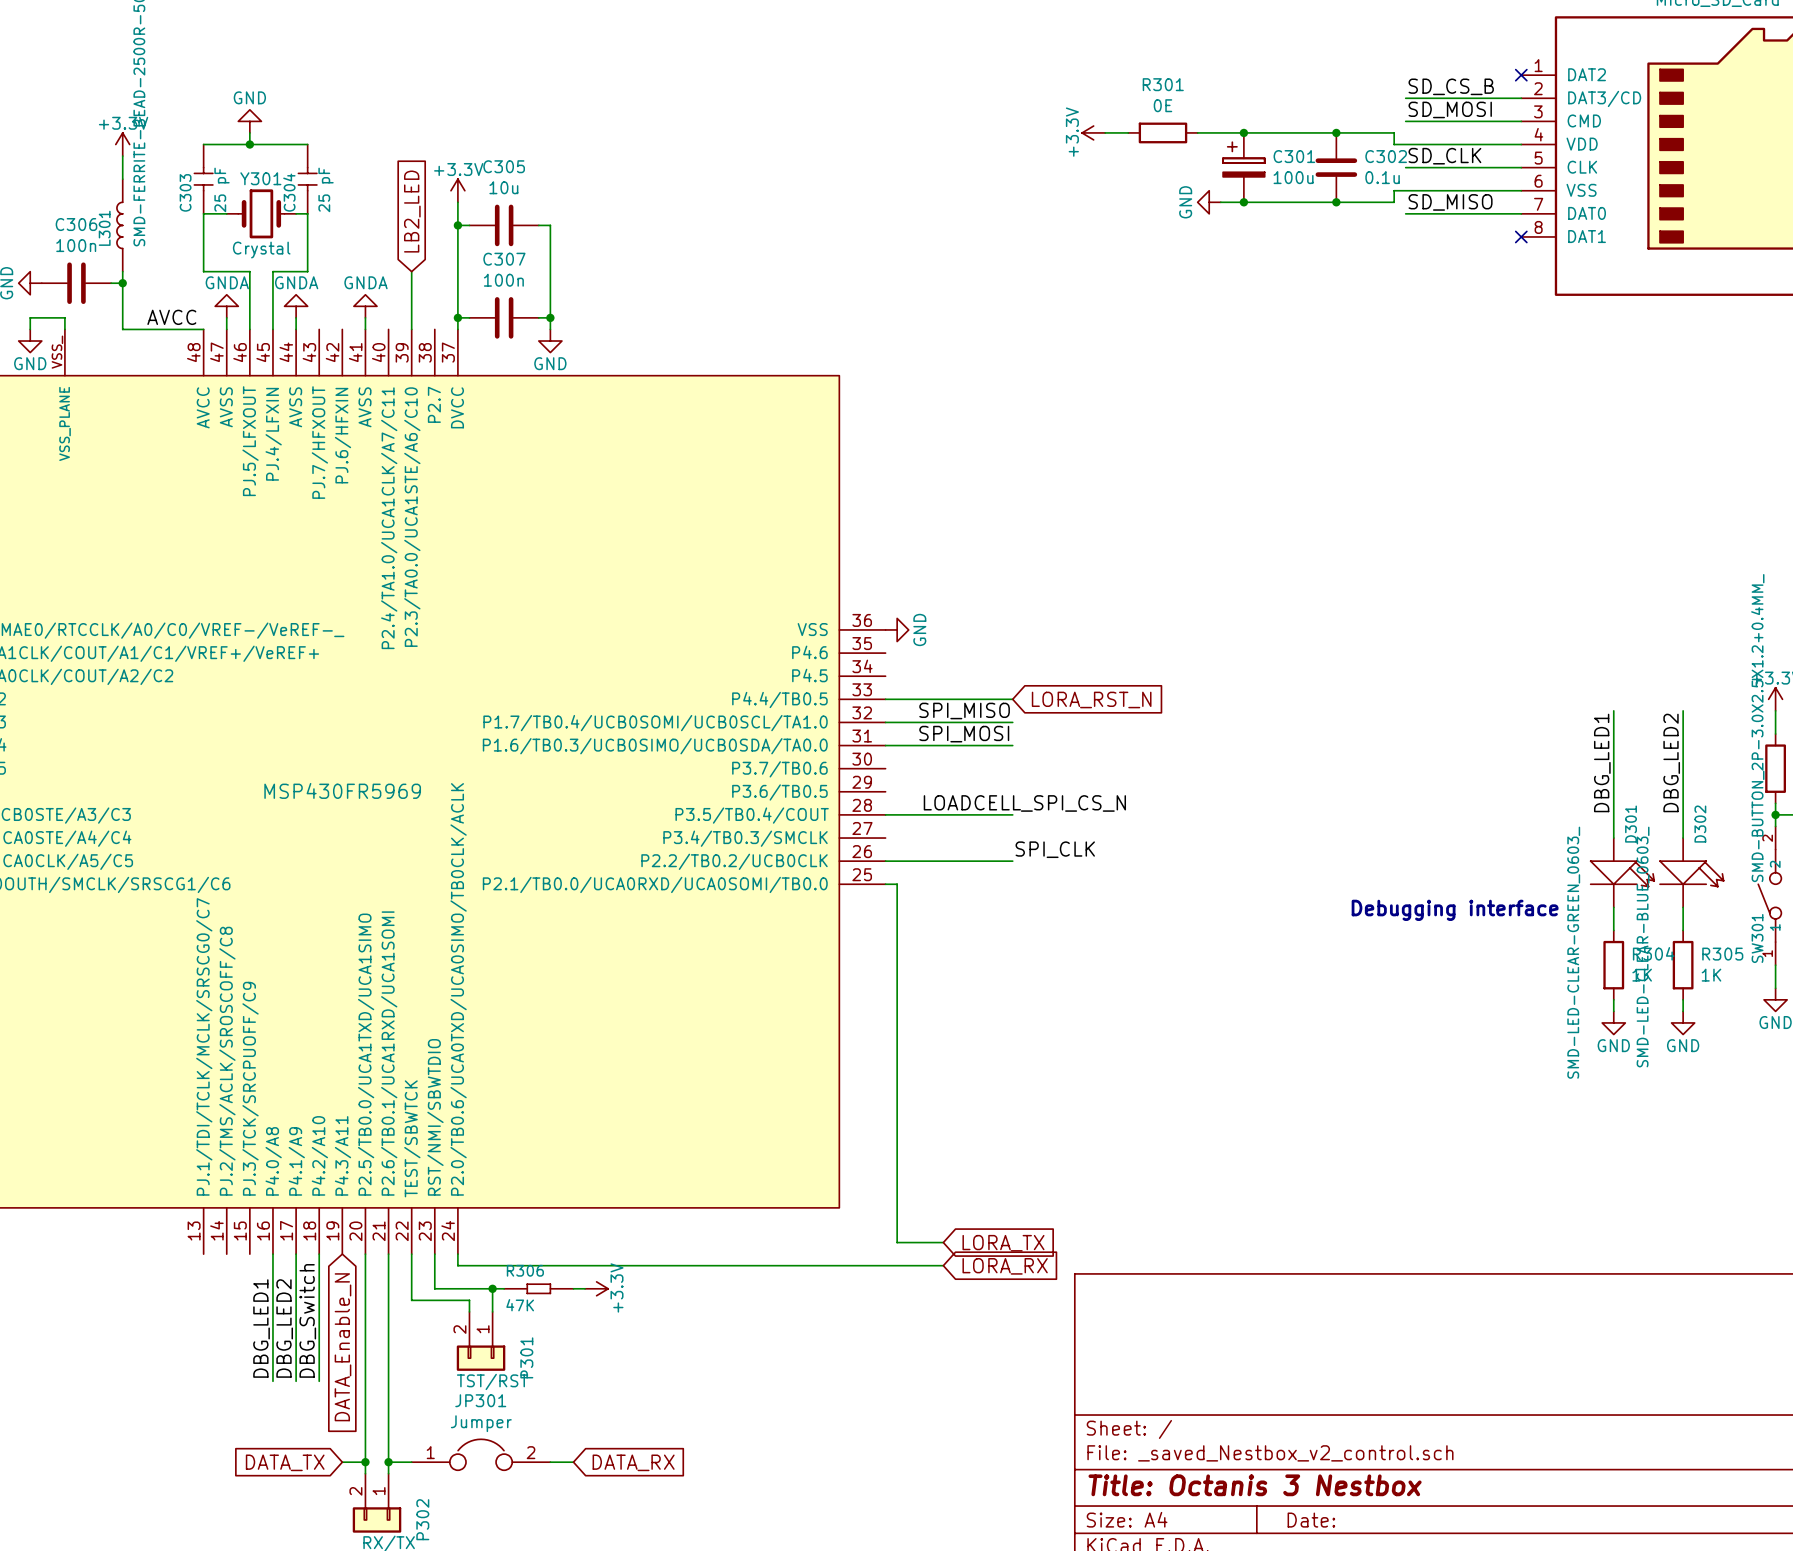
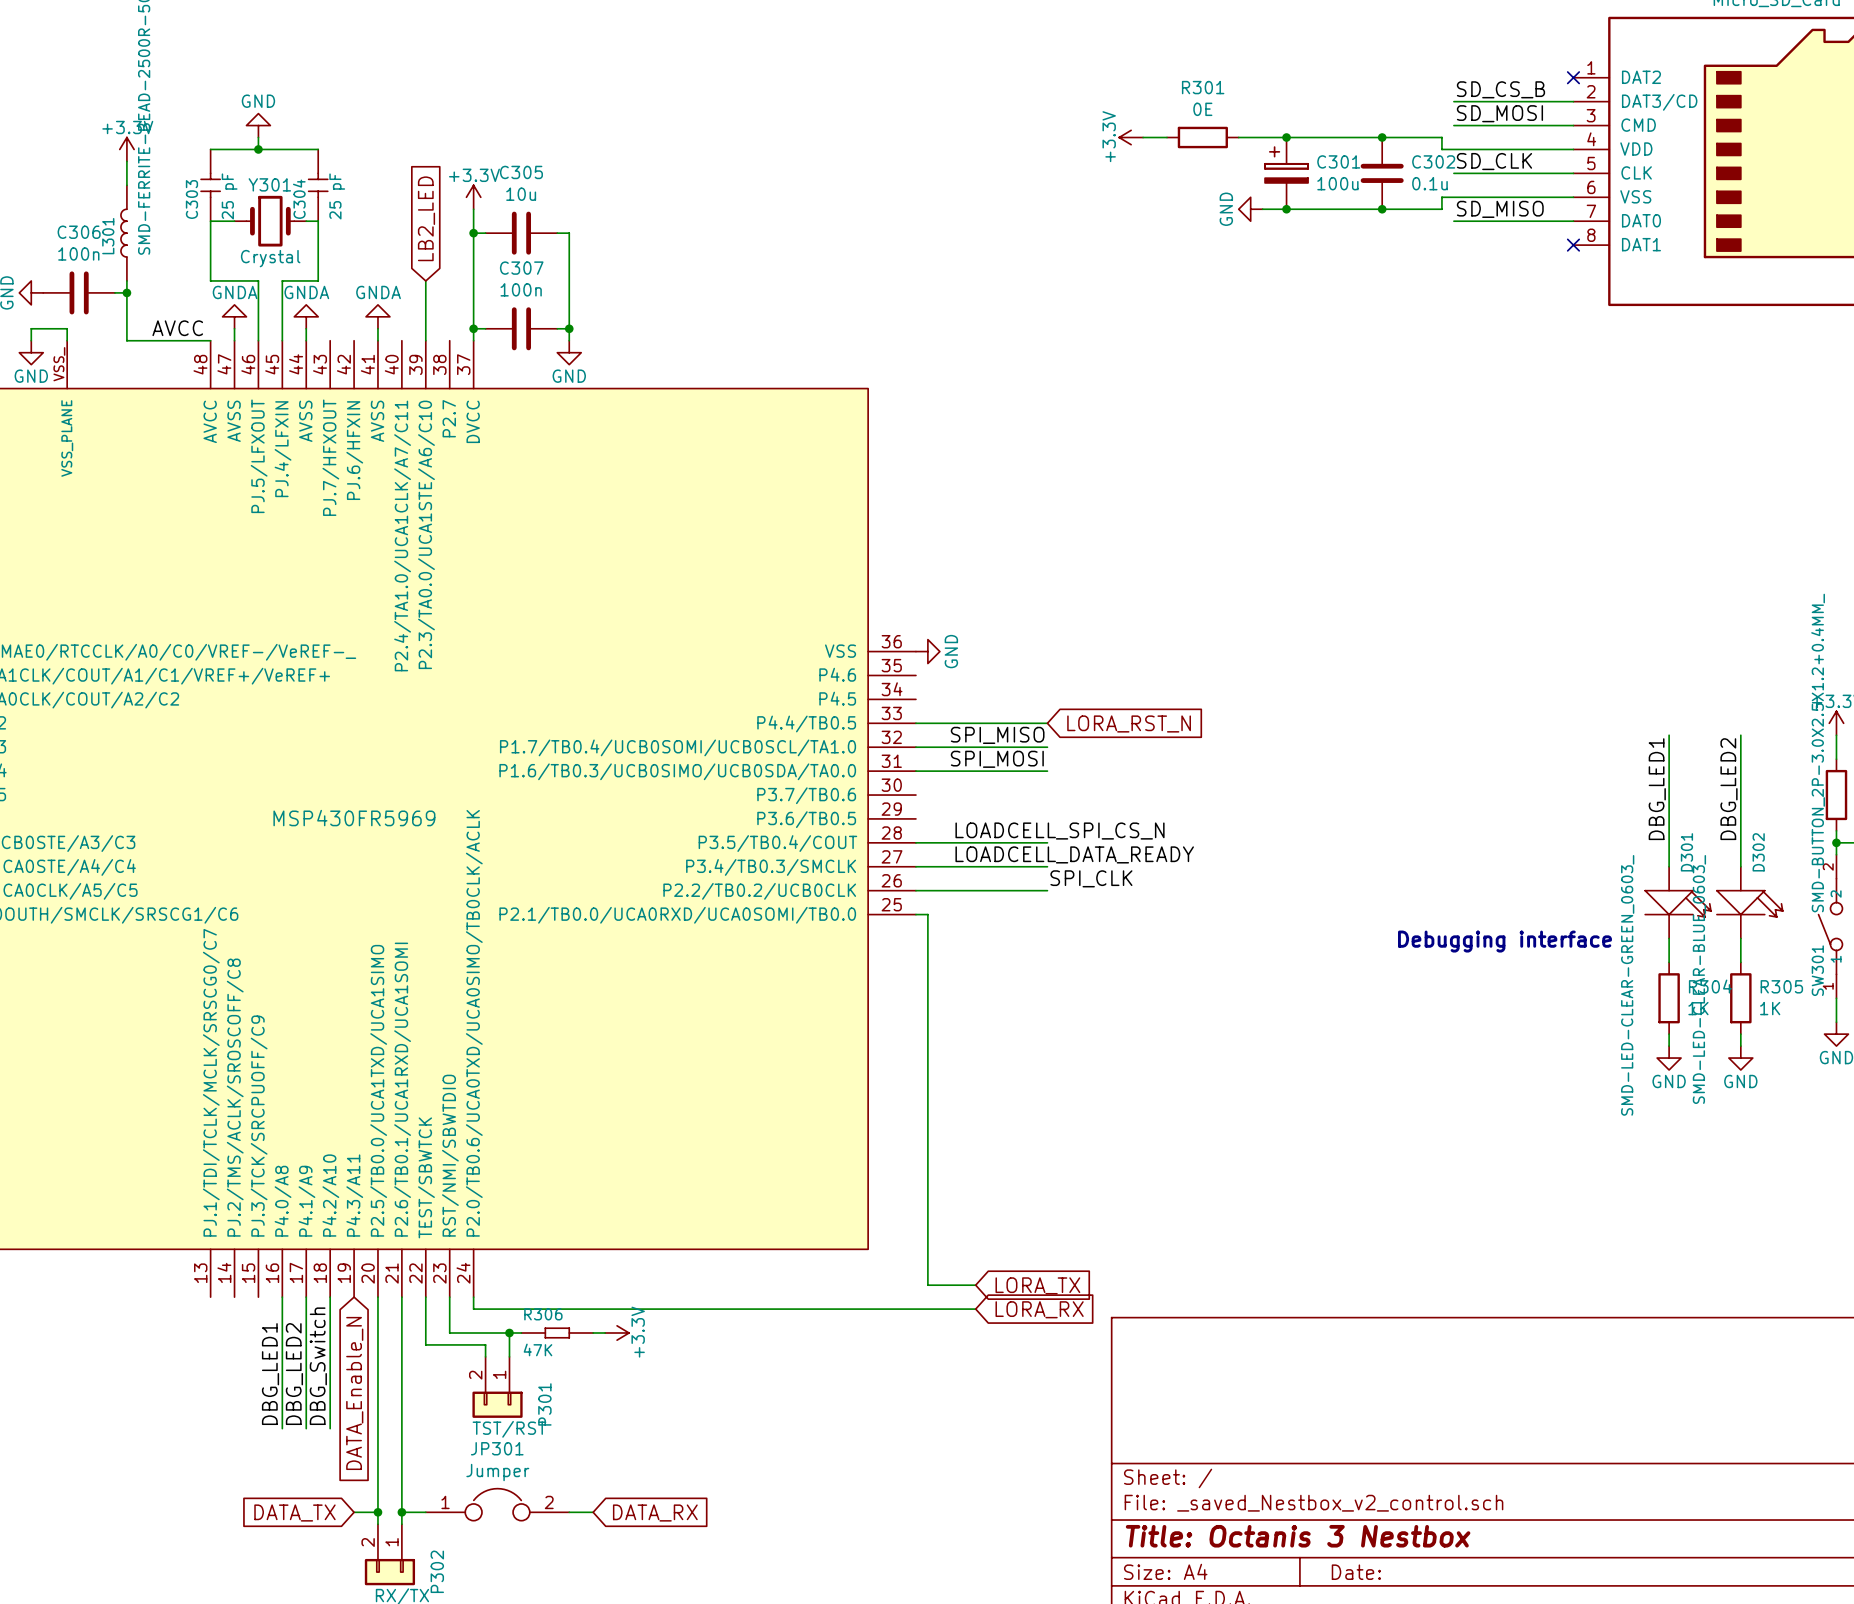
label: none -> LOADCELL_DATA_READY (1074, 854)
wire: none -> (915, 866) (1047, 866)

